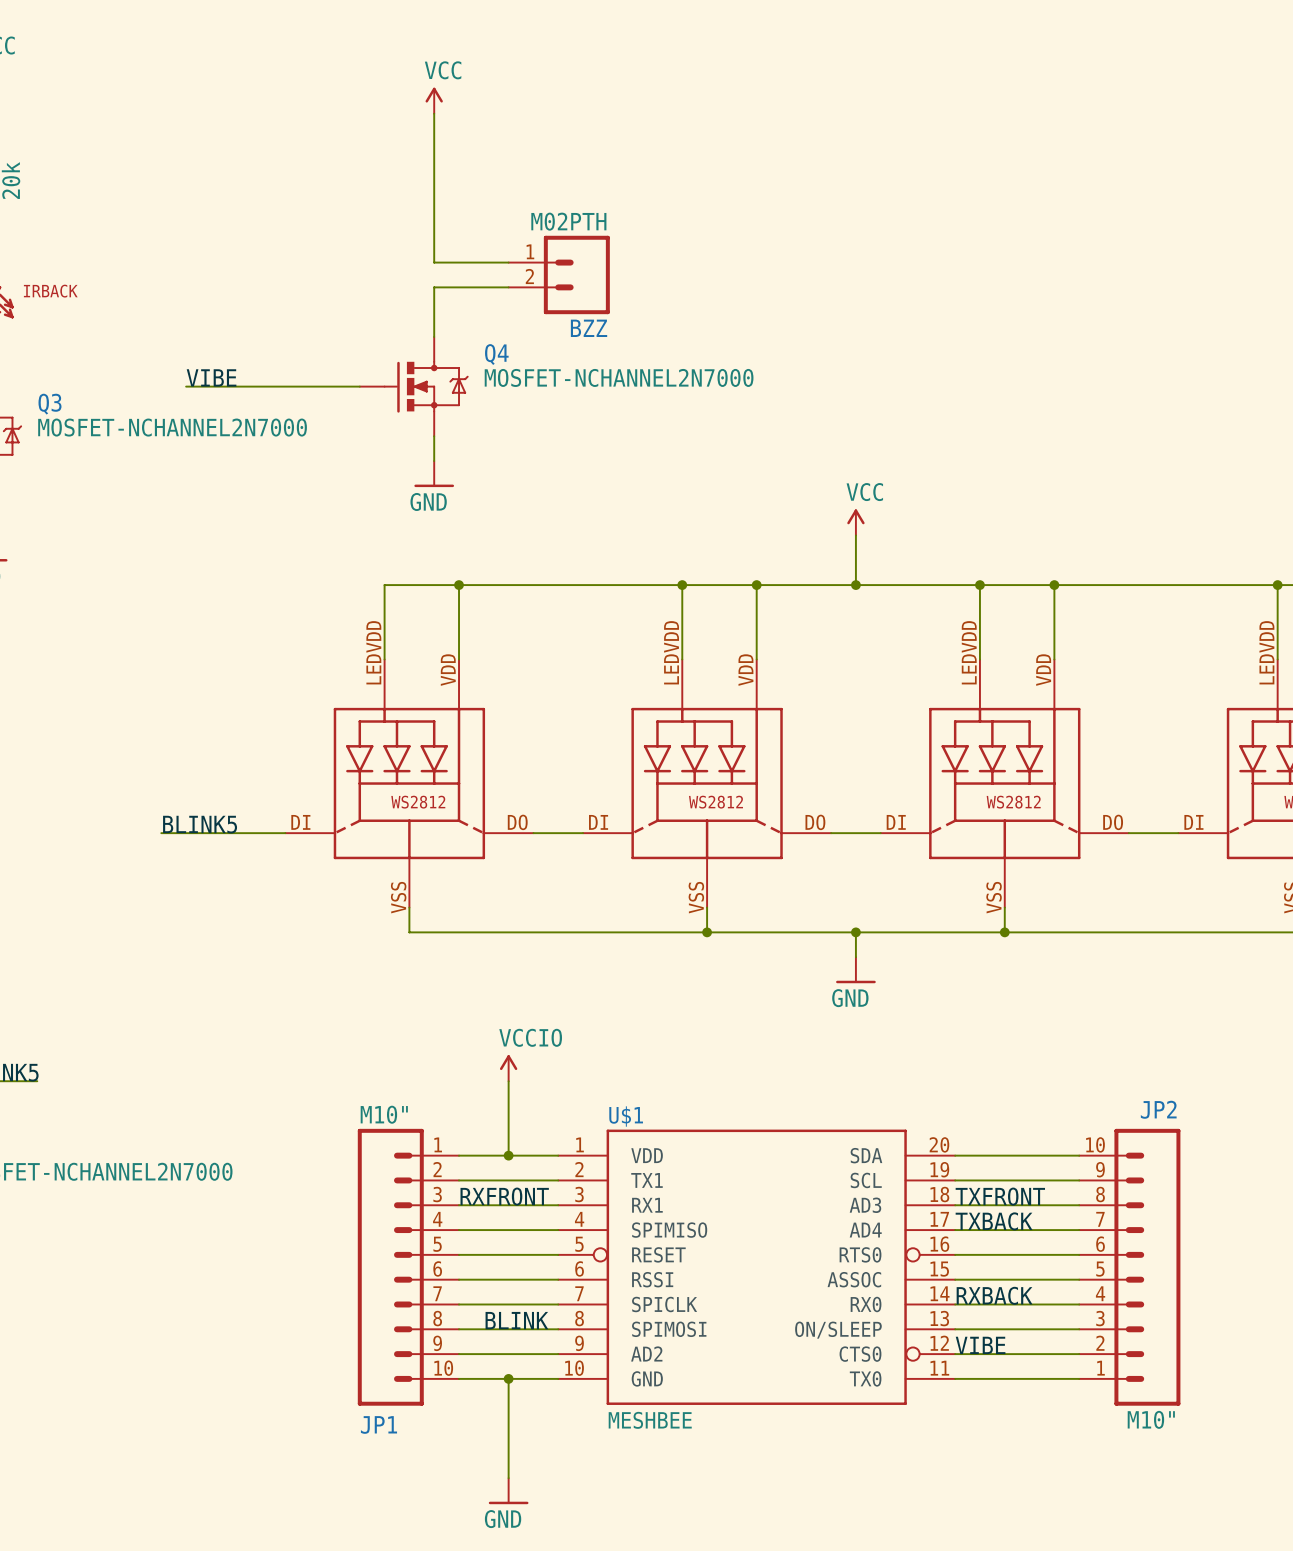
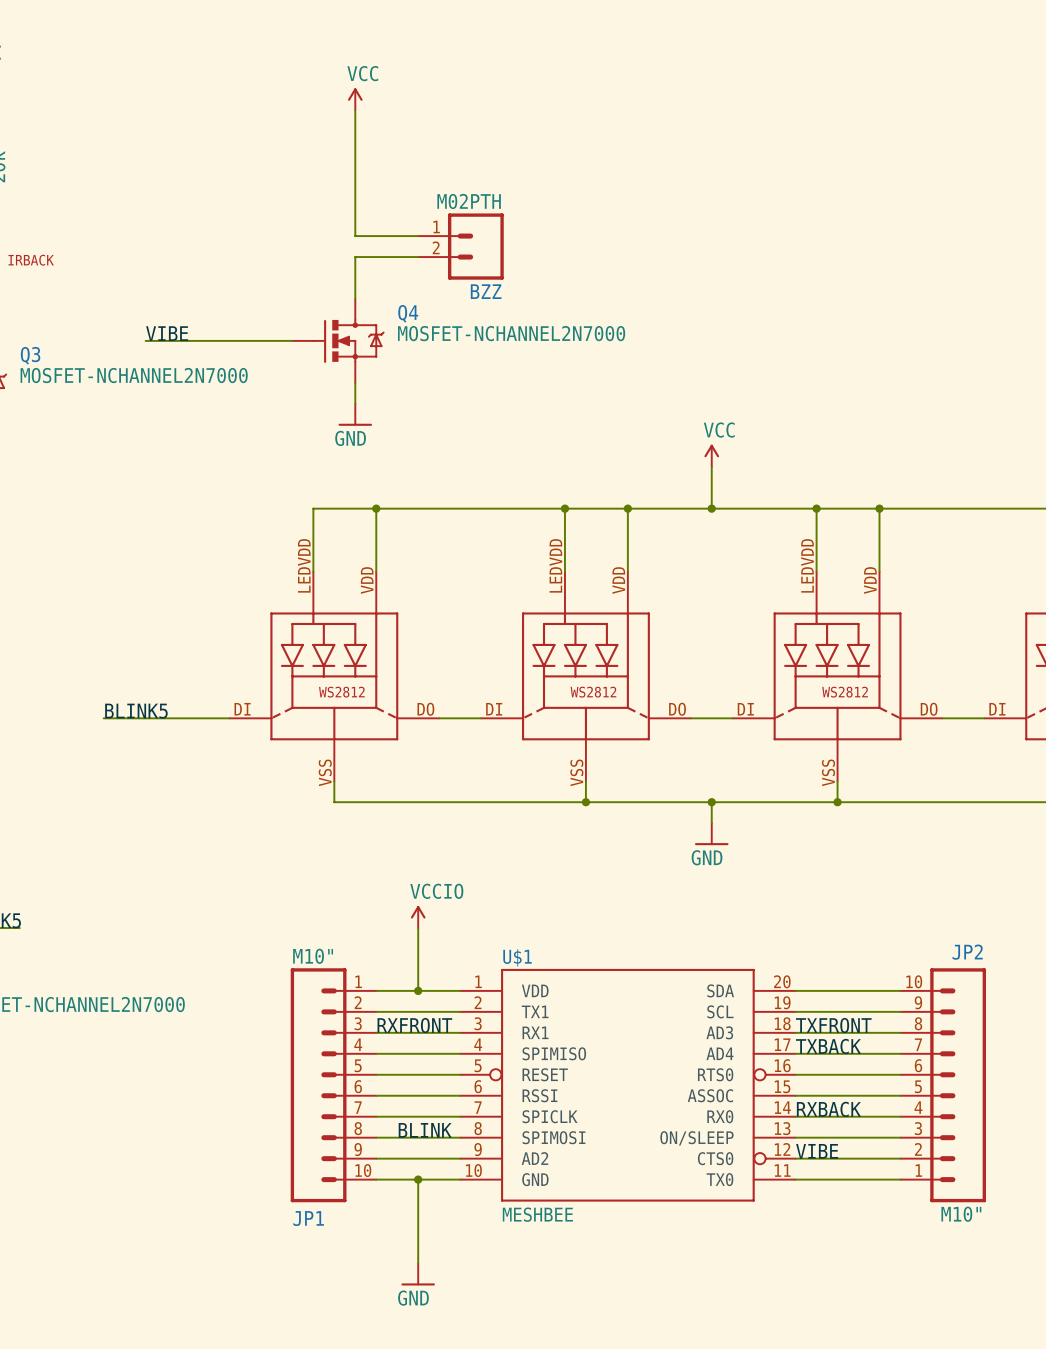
label position: BLINK5 (200, 824) -> BLINK5 (136, 711)
wire: none -> (103, 718) (124, 718)

